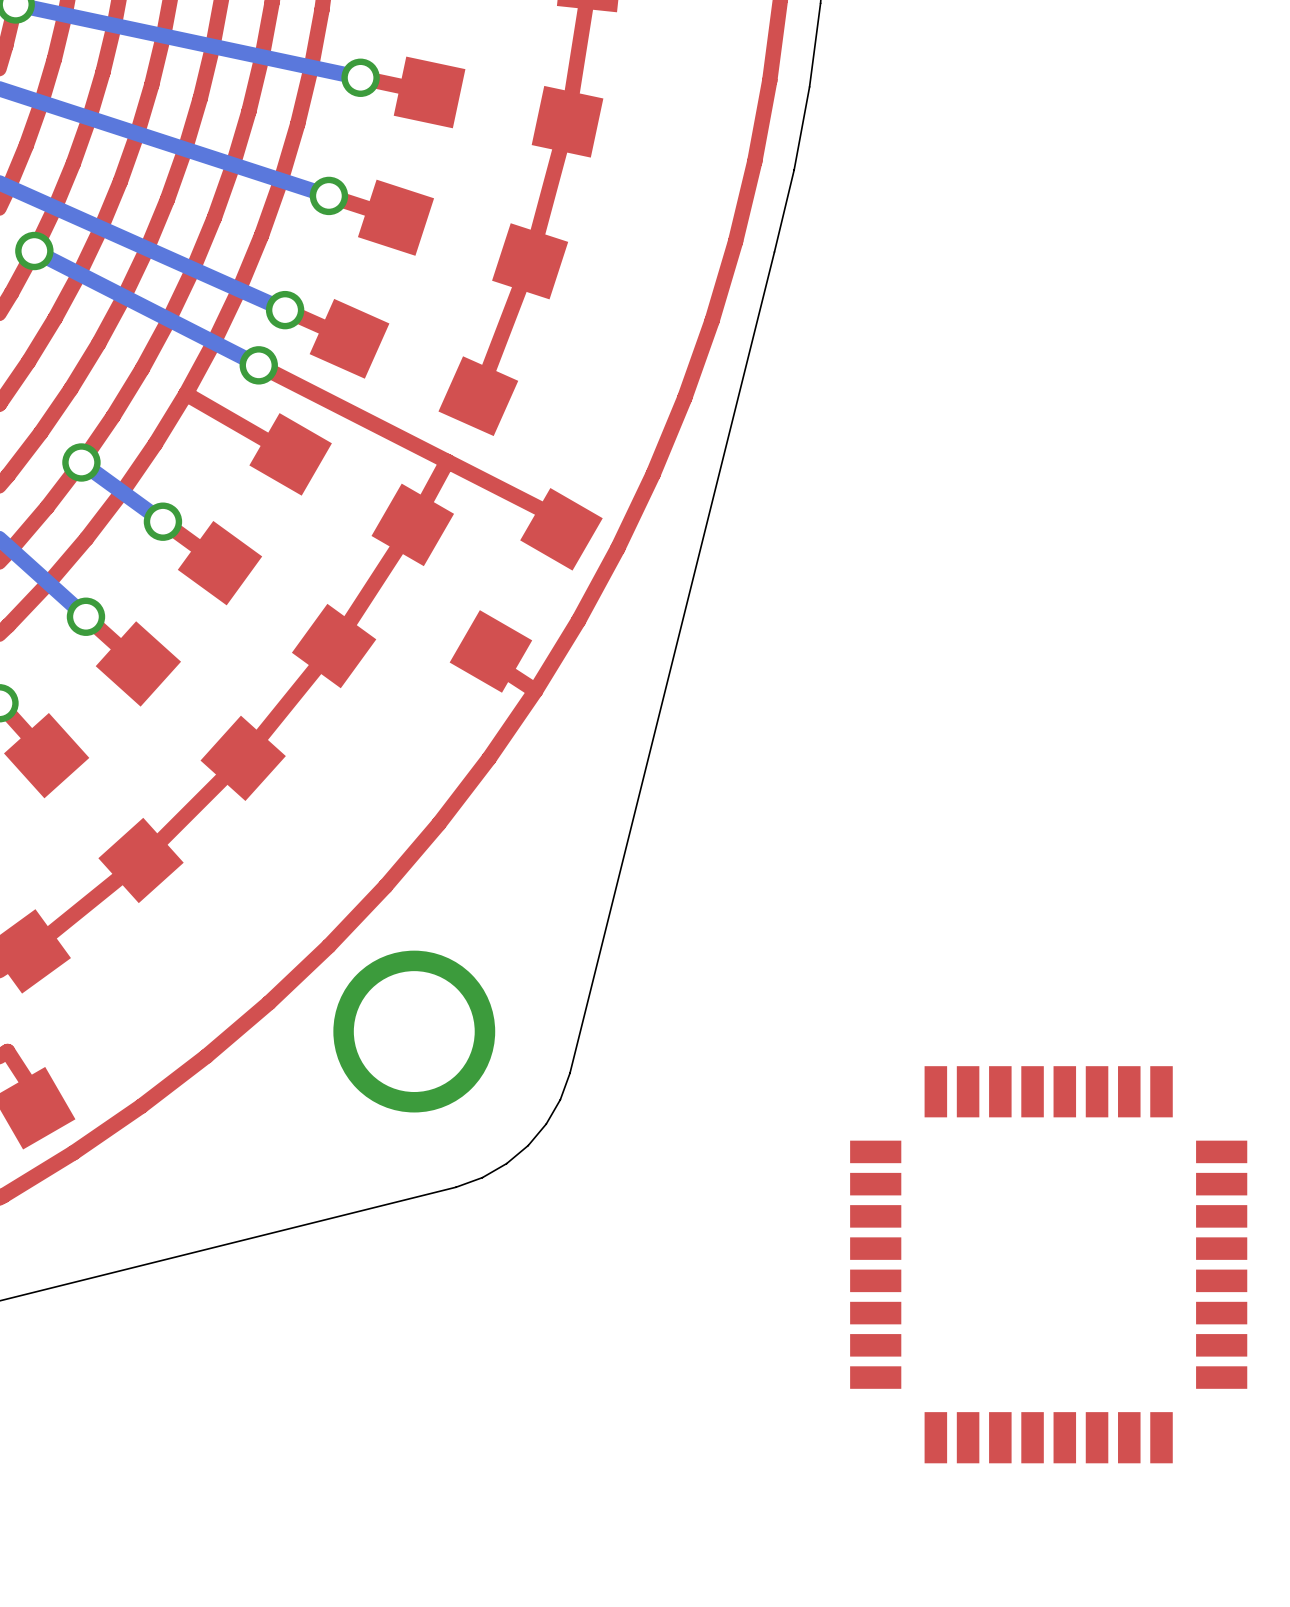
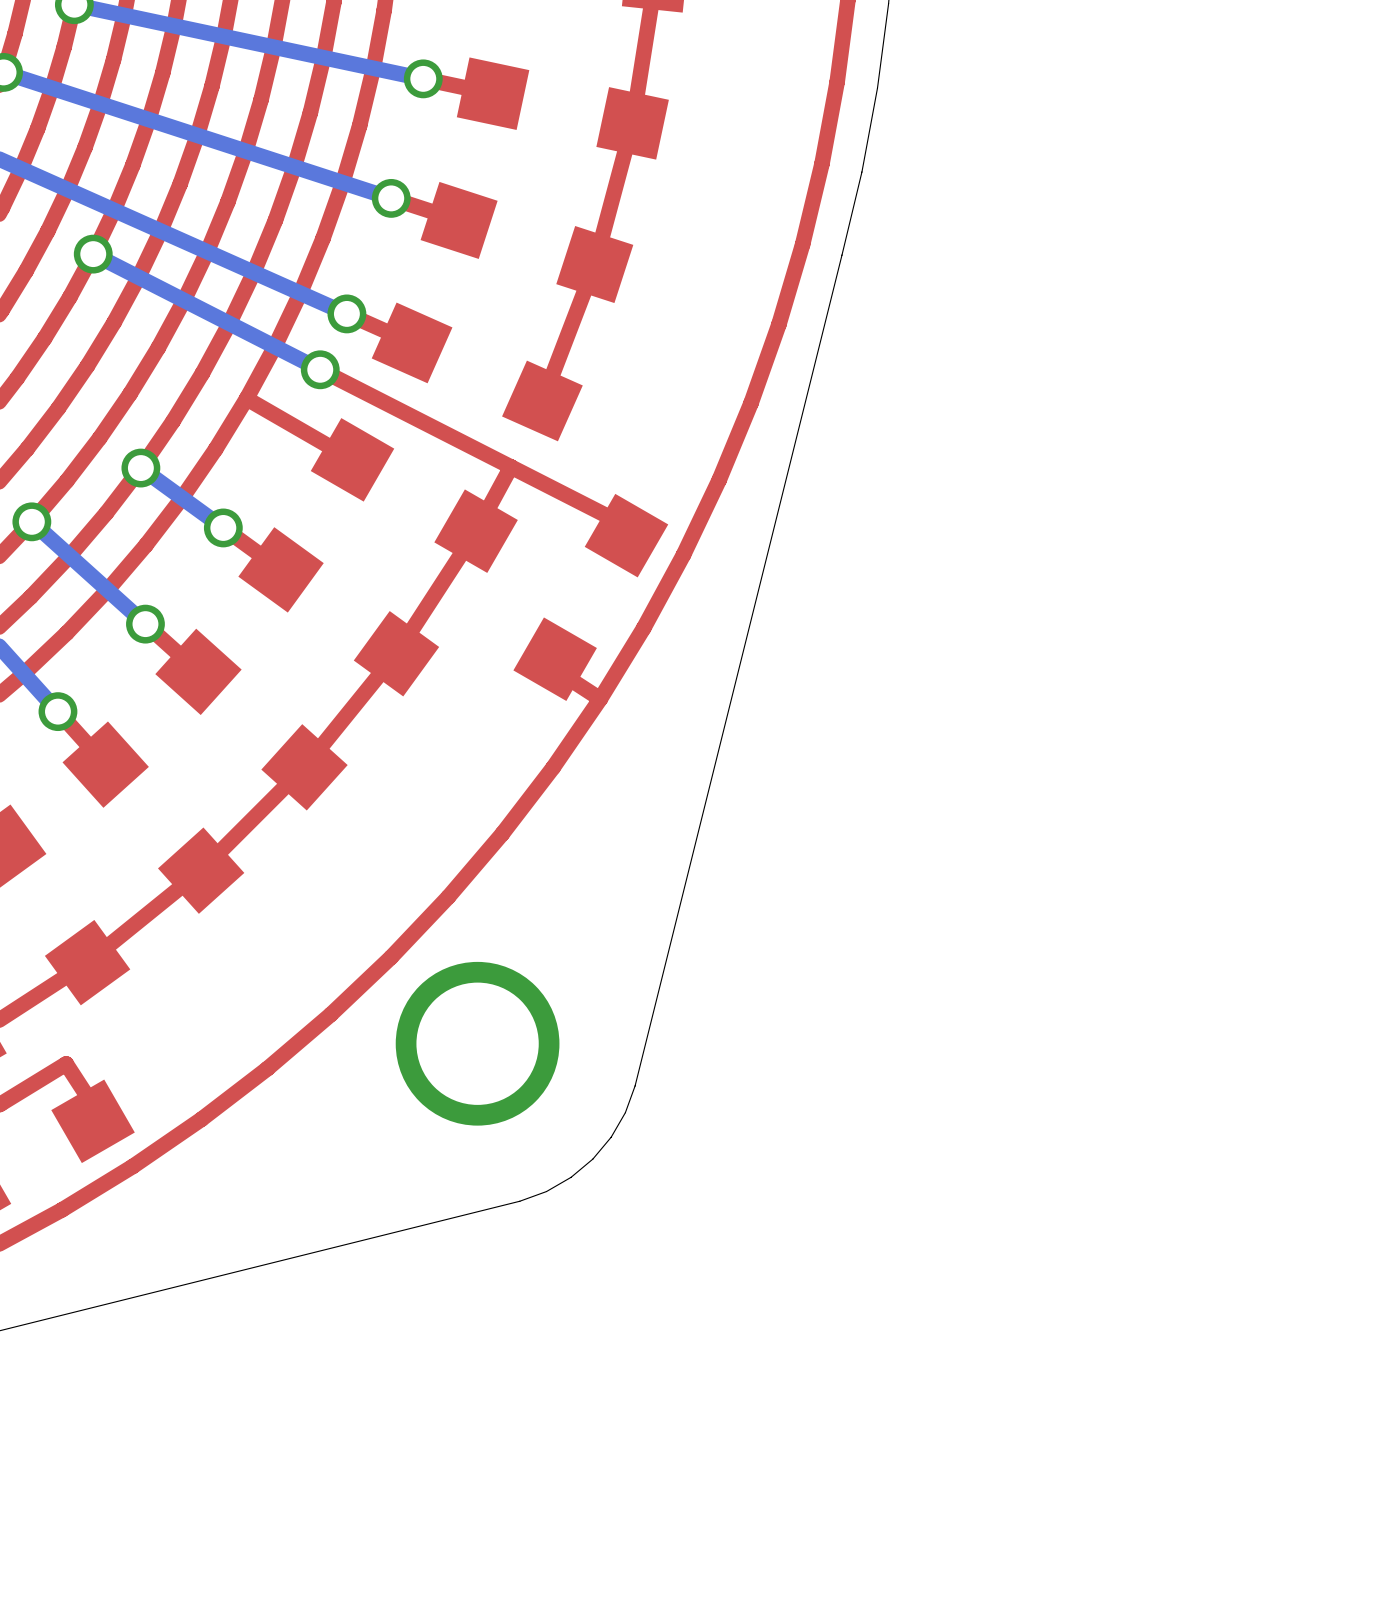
part: (1048, 1264) -> none

